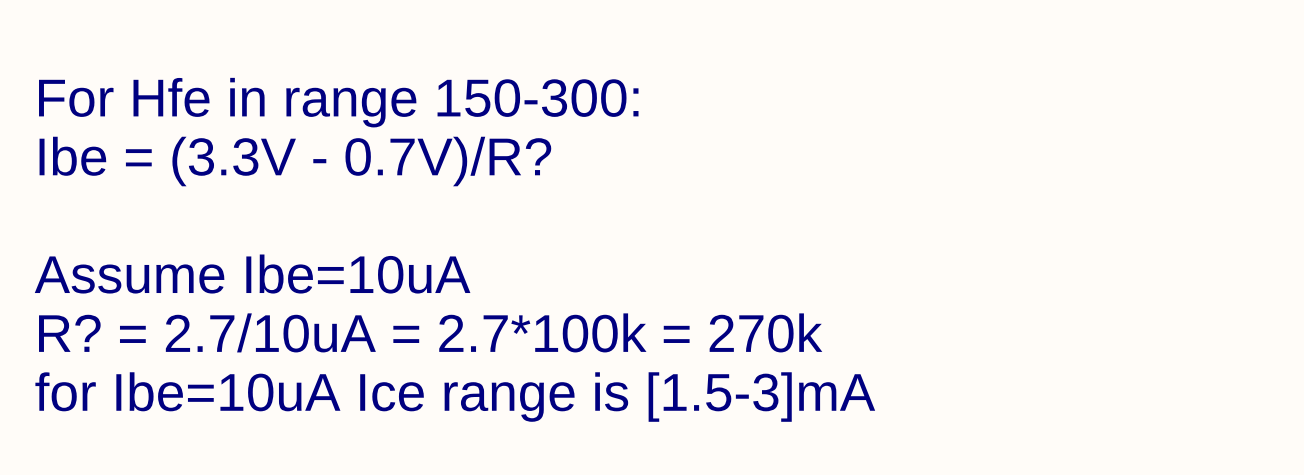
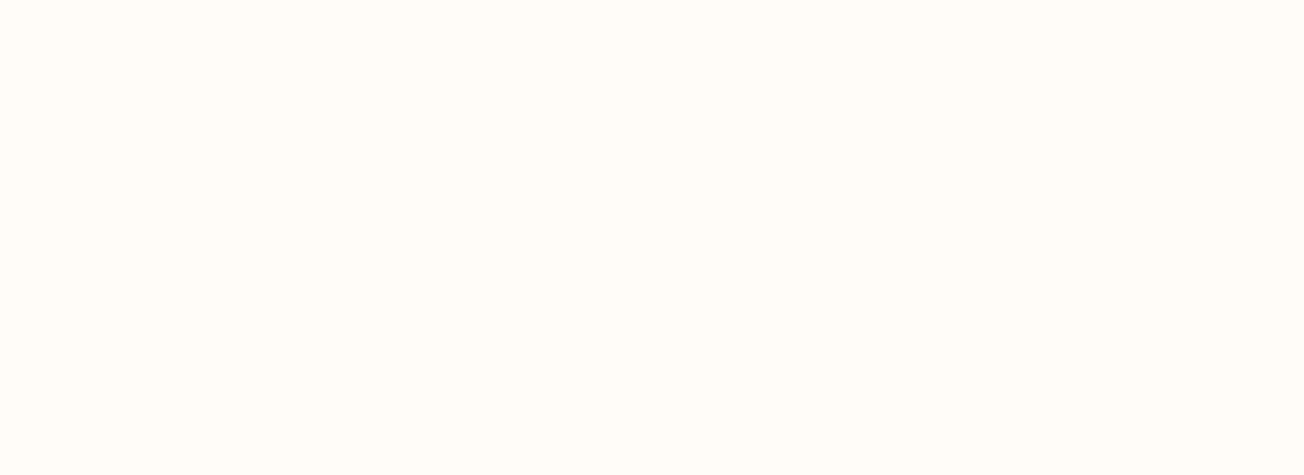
text: For Hfe in range 150-300: (338, 102) -> none
text: Ibe = (3.3V - 0.7V)/R? (295, 161) -> none
text: Assume Ibe=10uA (252, 274) -> none
text: R? = 2.7/10uA = 2.7*100k = 270k (430, 332) -> none
text: for Ibe=10uA Ice range is [1.5-3]mA (455, 397) -> none

